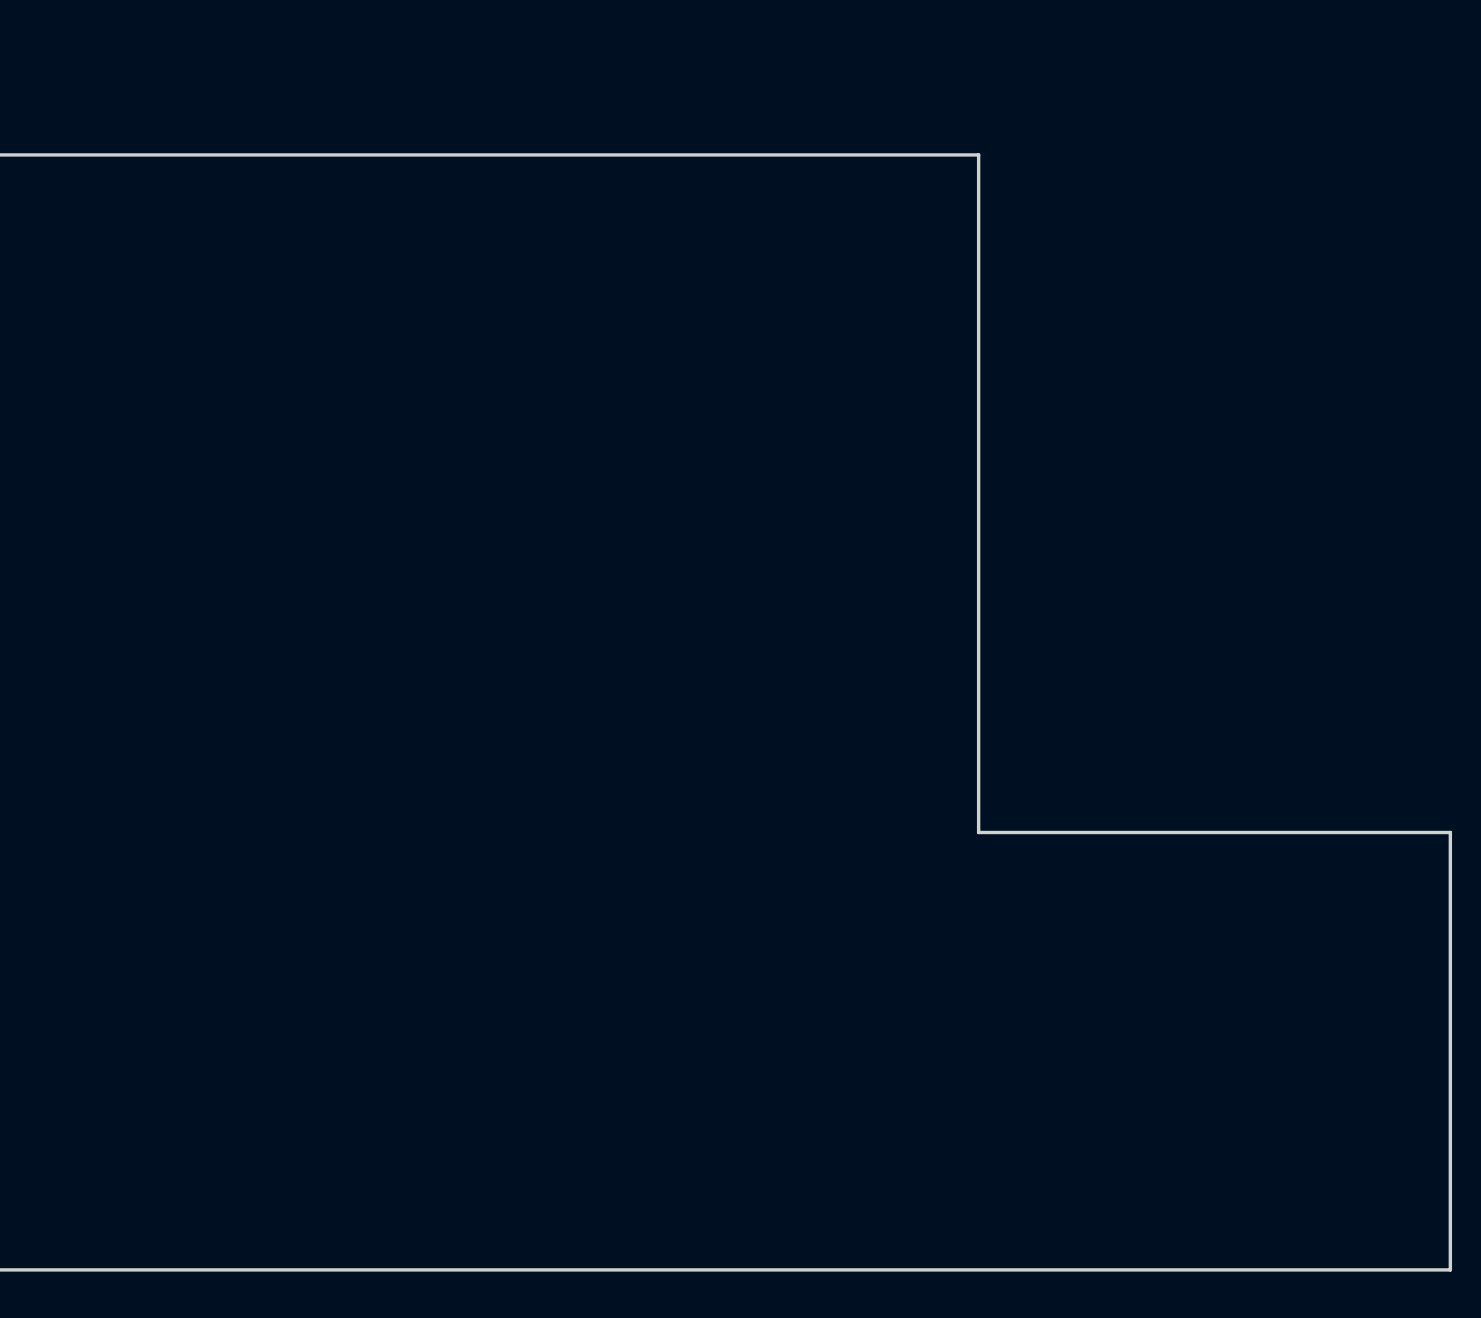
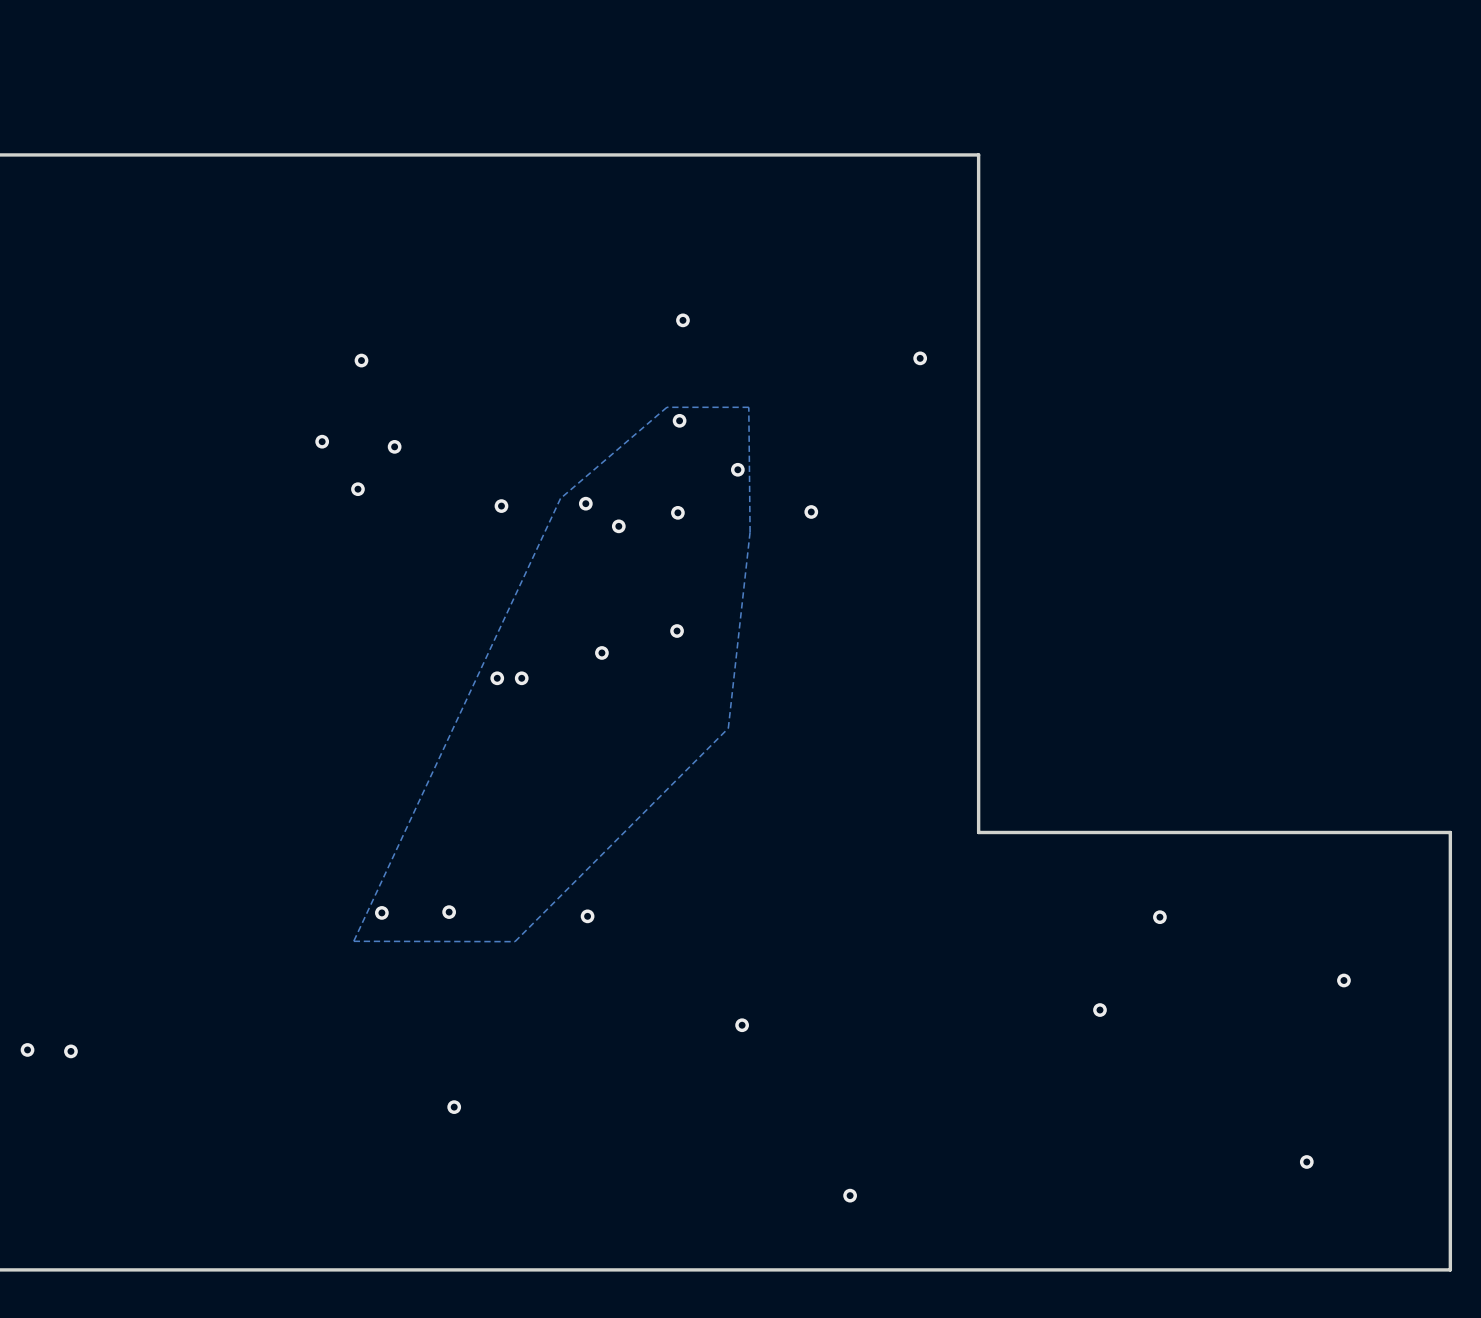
via: none -> (682, 320)
via: none -> (920, 358)
via: none -> (361, 360)
zone outline: none -> (748, 407) (750, 532) (728, 728) (515, 941) (353, 941) (560, 498) (666, 407) (748, 407)
via: none -> (679, 420)
via: none -> (322, 441)
via: none -> (394, 446)
via: none -> (737, 469)
via: none -> (357, 489)
via: none -> (585, 503)
via: none -> (501, 506)
via: none -> (811, 511)
via: none -> (677, 512)
via: none -> (618, 526)
via: none -> (677, 631)
via: none -> (601, 652)
via: none -> (497, 678)
via: none -> (521, 678)
via: none -> (381, 912)
via: none -> (449, 912)
via: none -> (587, 916)
via: none -> (1159, 917)
via: none -> (1343, 980)
via: none -> (1099, 1010)
via: none -> (742, 1025)
via: none -> (27, 1049)
via: none -> (70, 1051)
via: none -> (454, 1107)
via: none -> (1306, 1161)
via: none -> (850, 1195)

